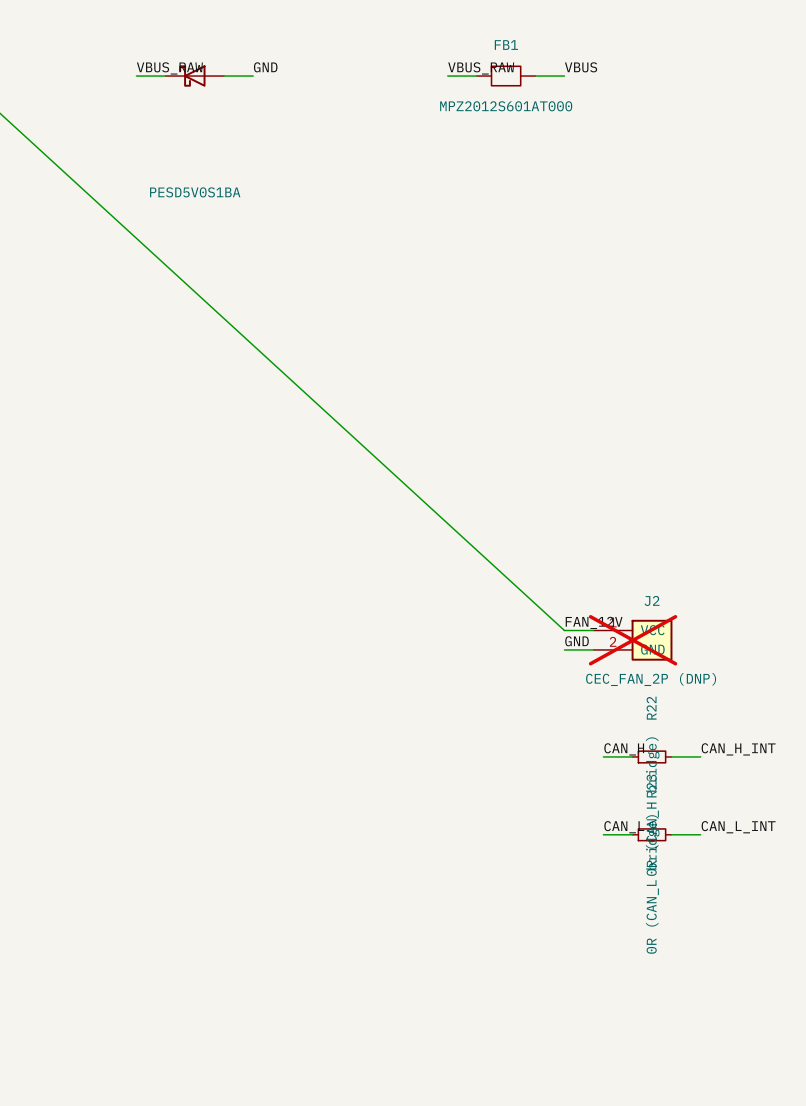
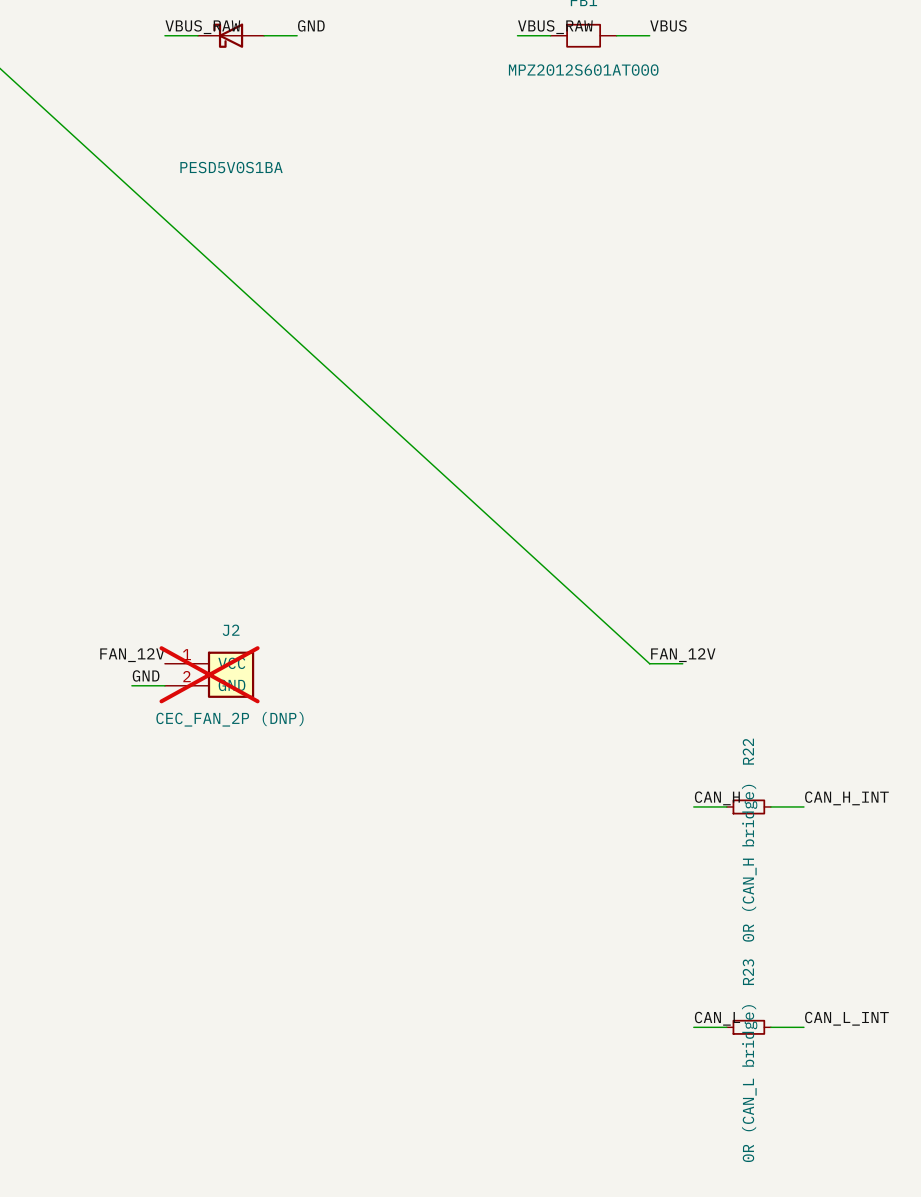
label: none -> FAN_12V (132, 655)
J2 position: (633, 640) -> (209, 674)
label: none -> GND (146, 675)
label: GND (577, 641) -> none
wire: none -> (131, 685) (164, 685)
wire: (564, 649) (593, 649) -> none
label position: CAN_L (624, 827) -> CAN_L (717, 1018)
label position: CAN_L_INT (738, 827) -> CAN_L_INT (846, 1018)
wire: (603, 834) (632, 834) -> (693, 1027) (726, 1027)
R23 position: (652, 834) -> (748, 1027)
wire: (671, 834) (700, 834) -> (770, 1027) (803, 1027)

